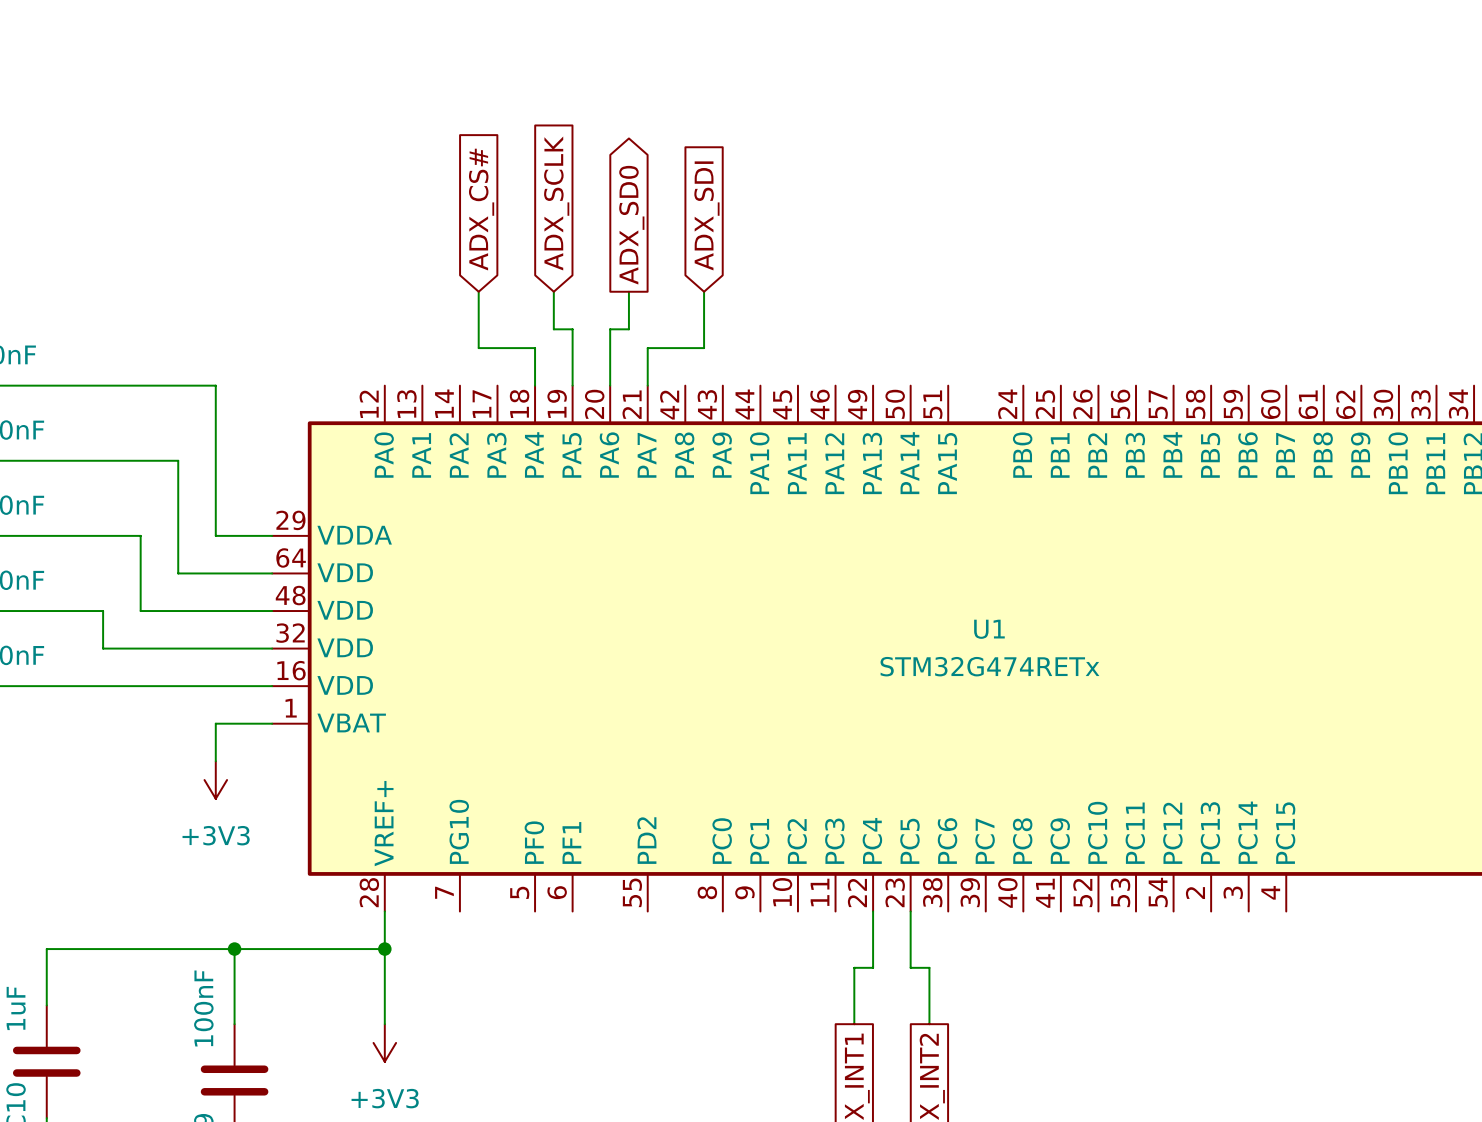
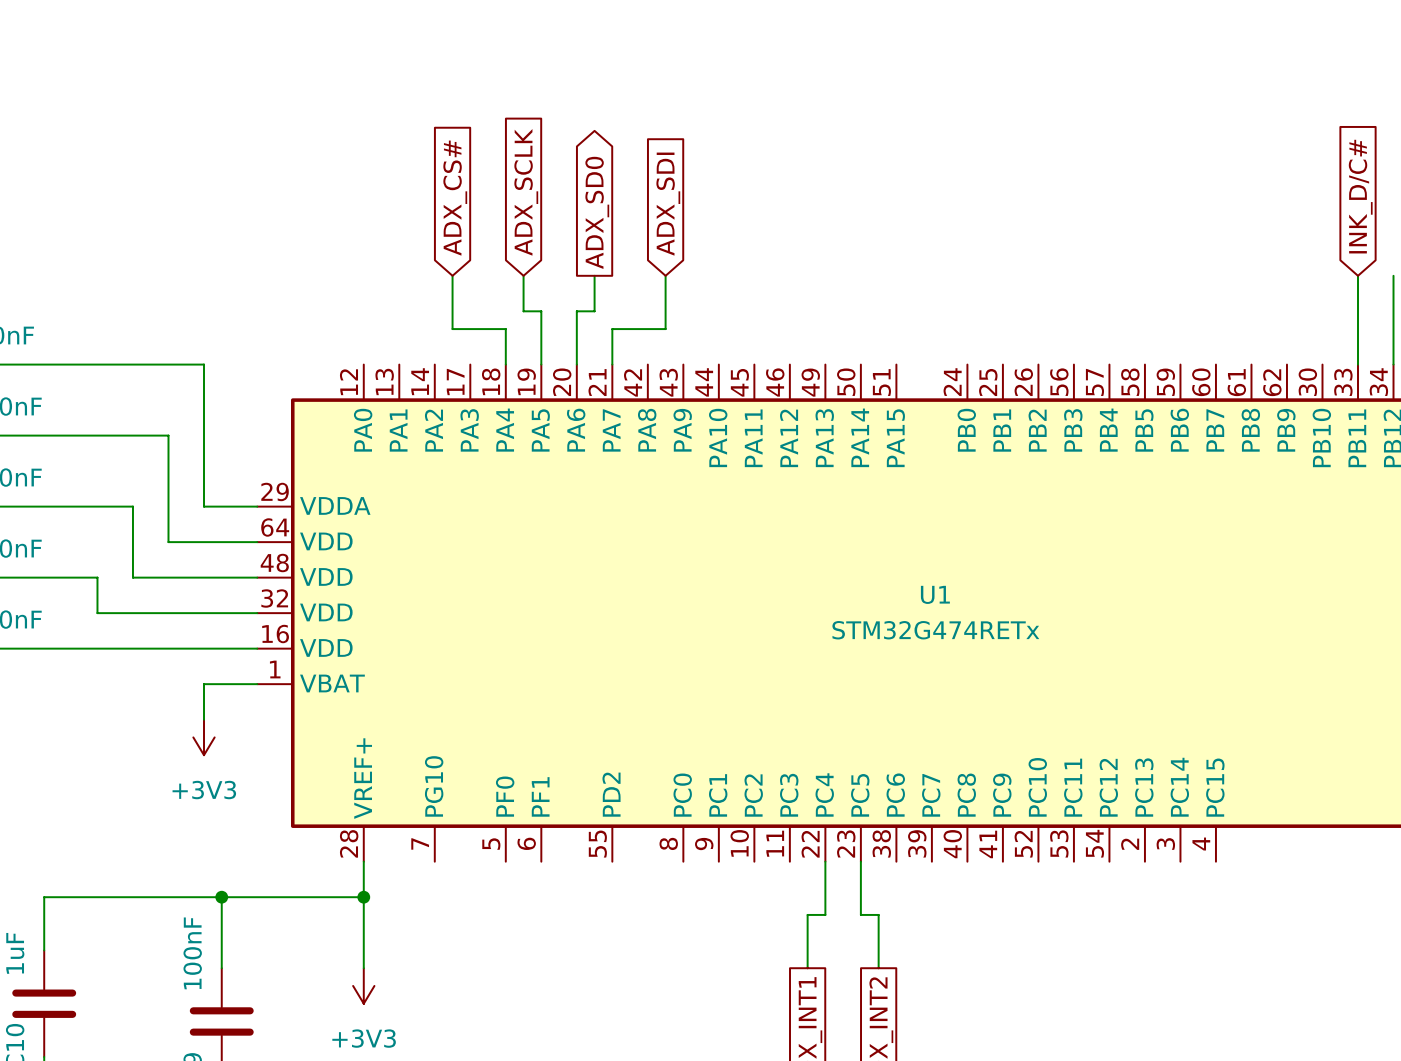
global label: none -> INK_D/C# (1360, 196)
wire: none -> (1358, 275) (1358, 364)
wire: none -> (1393, 275) (1393, 364)

